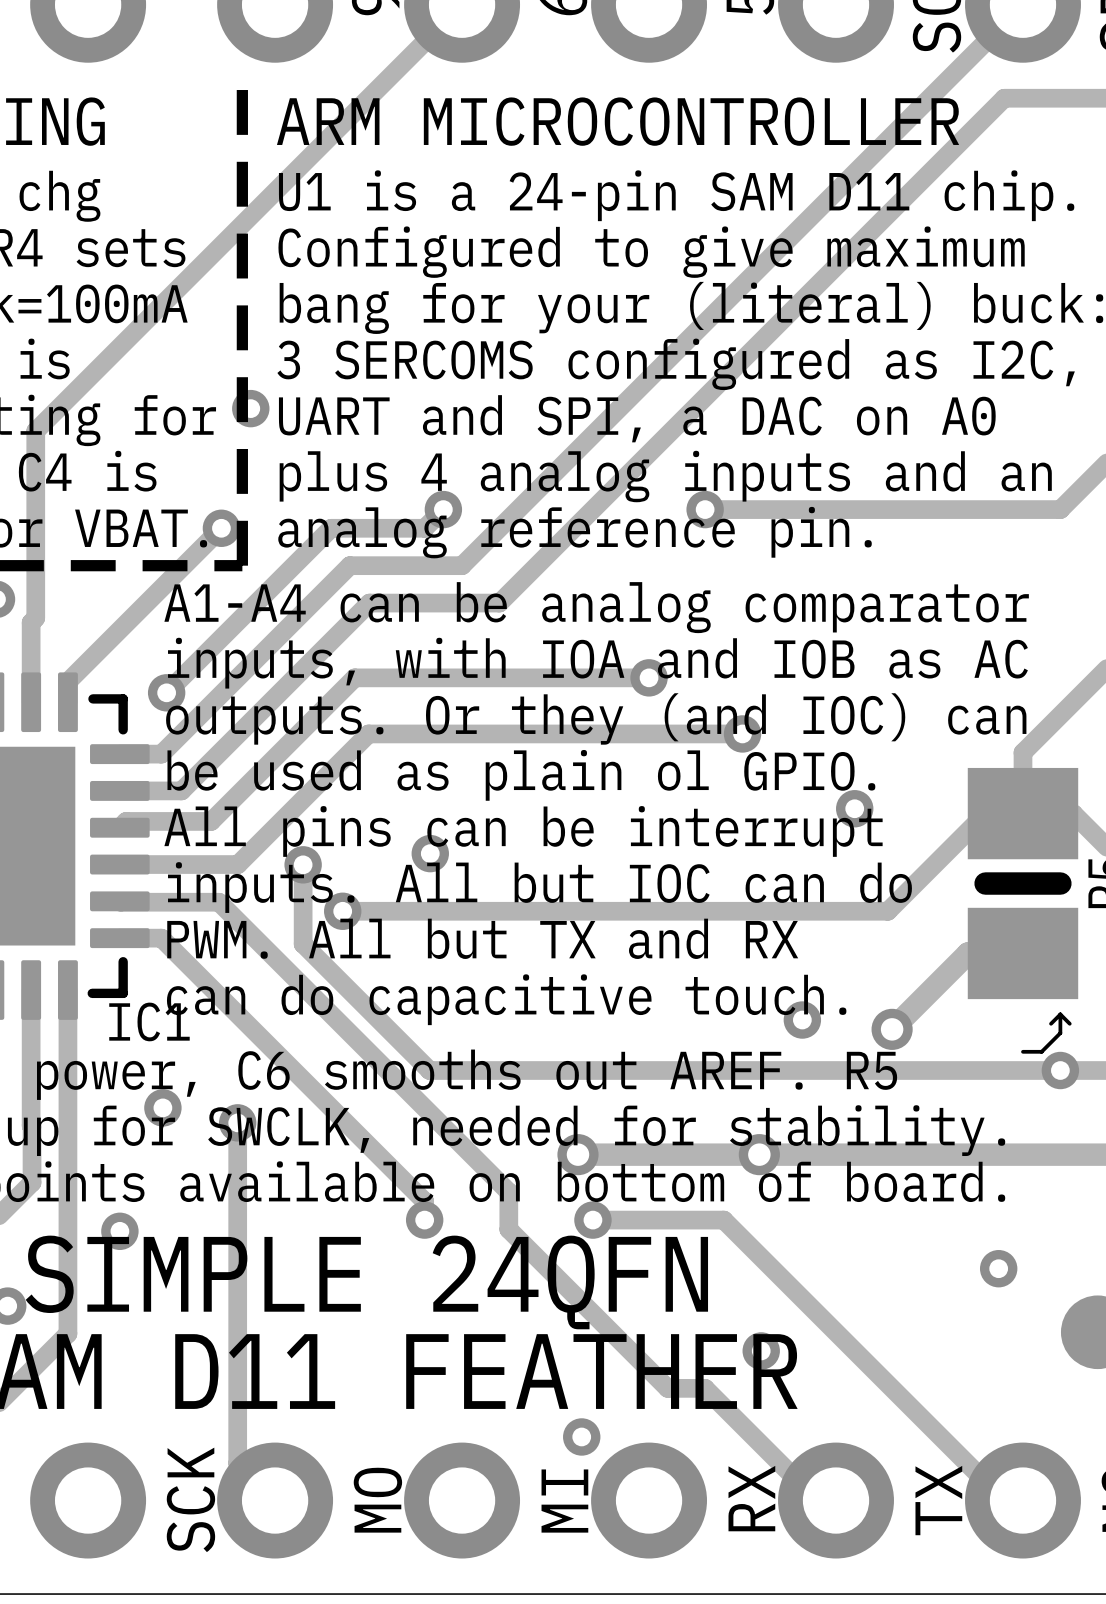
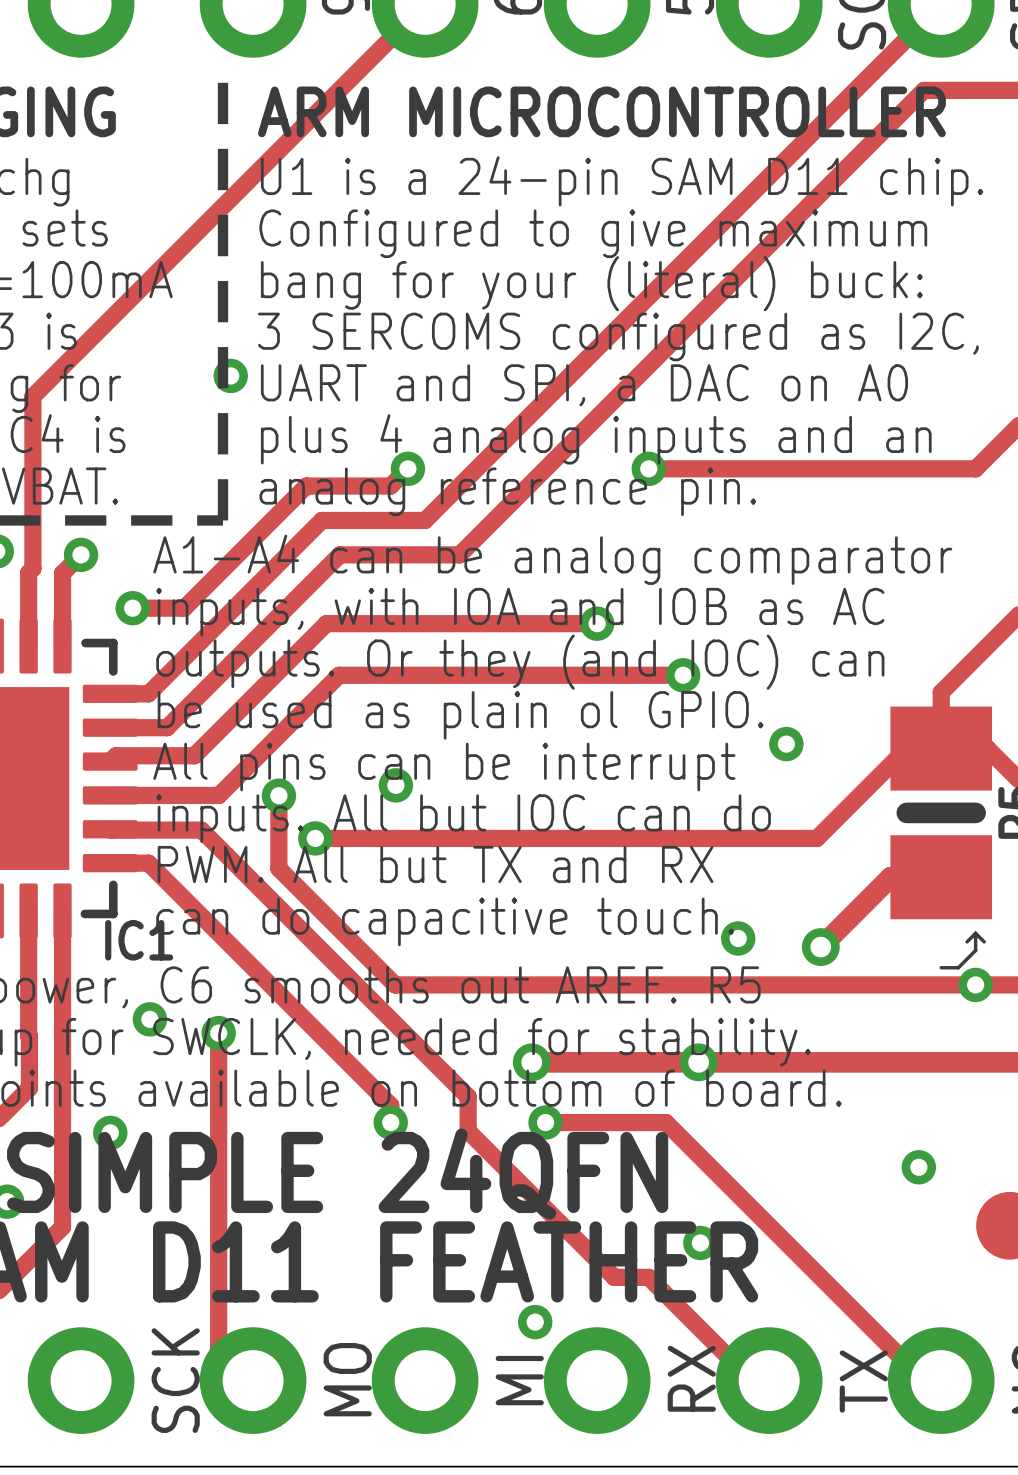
track: (221, 528) (67, 681) -> (81, 554) (62, 573) (62, 627)
via: (221, 528) -> none
track: (333, 528) (166, 692) -> (306, 486) (184, 608) (132, 608)
via: none -> (81, 554)
via position: (166, 692) -> (132, 608)

